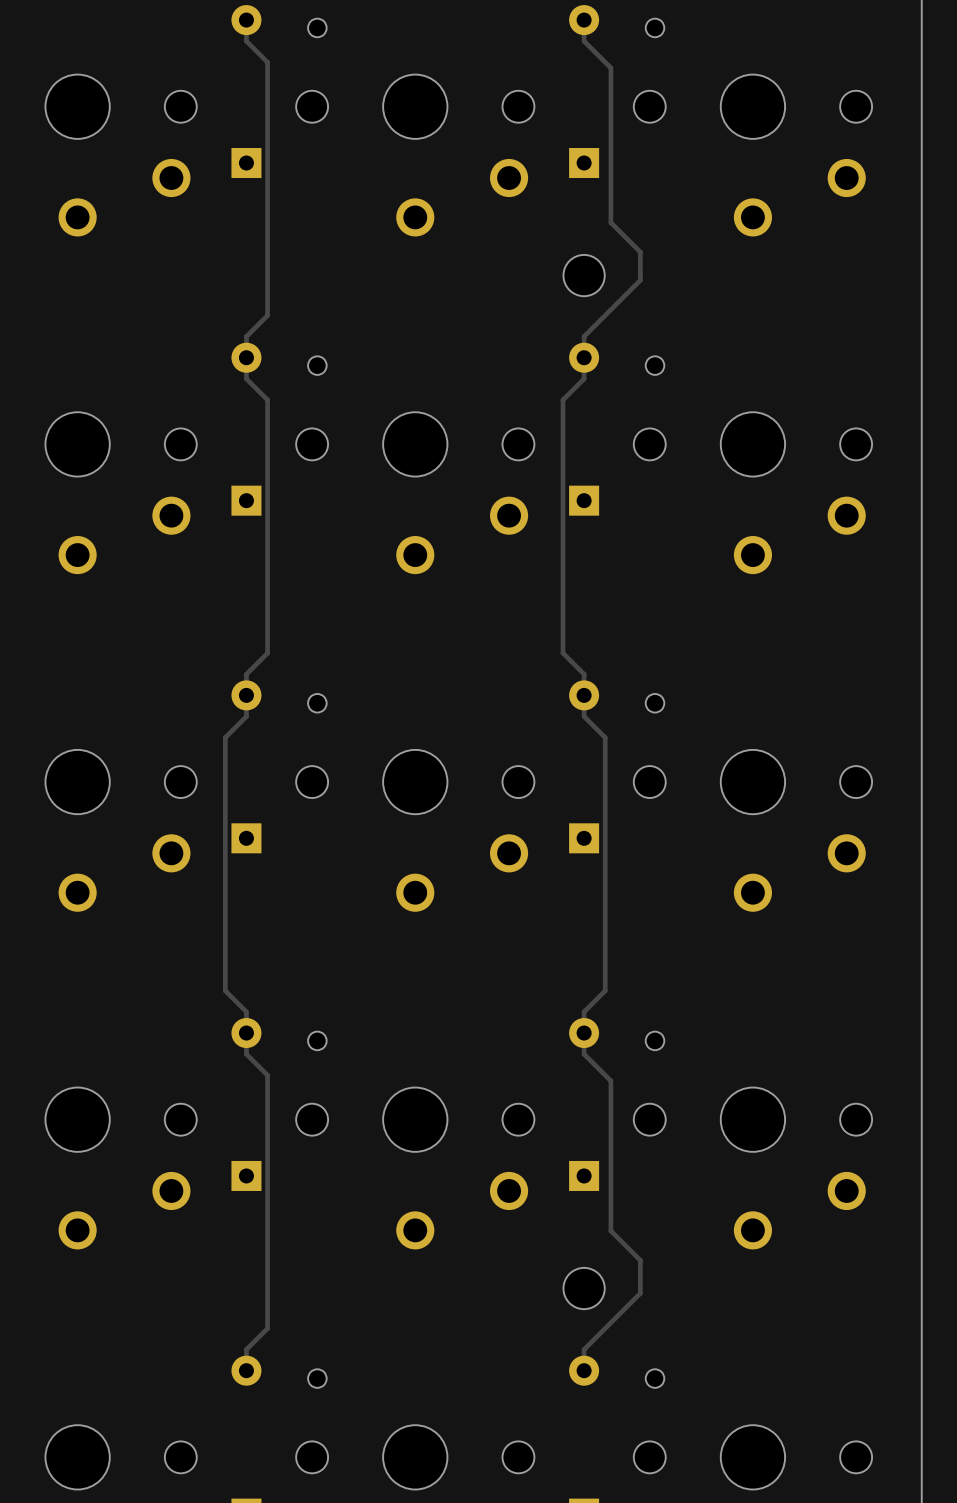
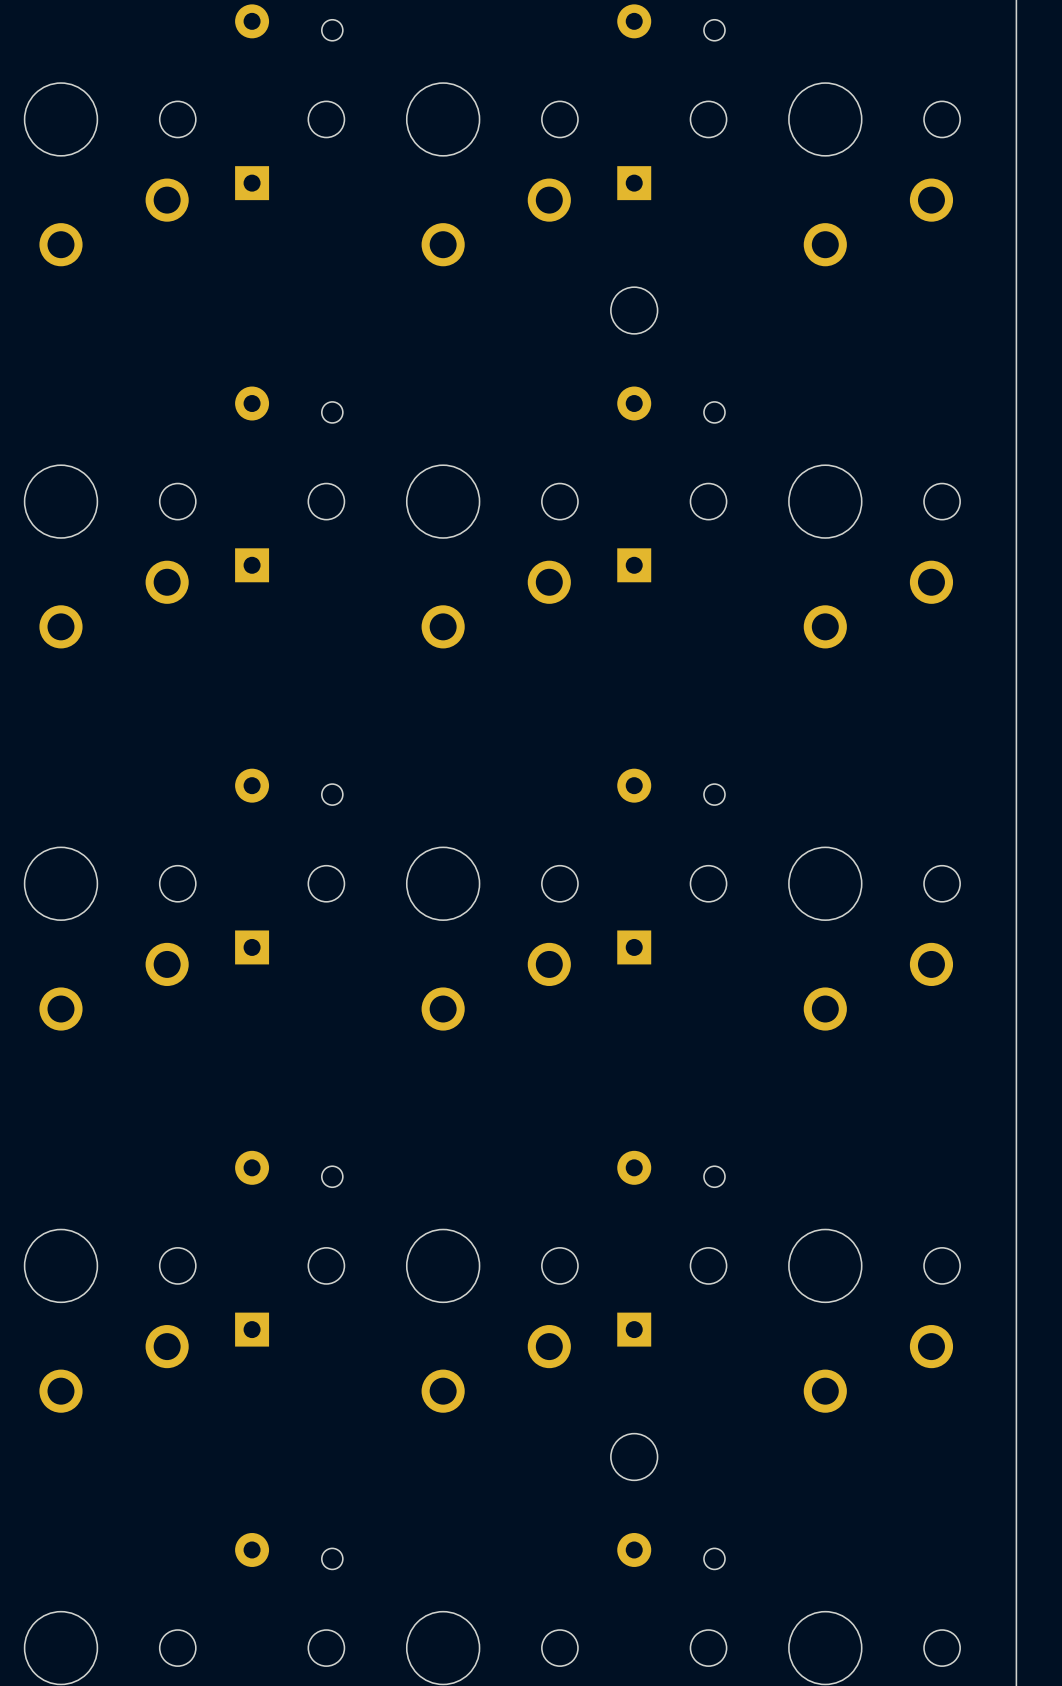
track: (246, 20) (246, 41) (267, 62) (267, 315) (246, 336) (246, 378) (267, 399) (267, 653) (246, 674) (246, 716) (225, 737) (225, 990) (246, 1011) (246, 1054) (267, 1075) (267, 1328) (246, 1349) (246, 1370) -> none
track: (584, 20) (584, 41) (610, 68) (610, 222) (640, 252) (640, 280) (584, 336) (584, 378) (563, 399) (563, 653) (584, 674) (584, 716) (605, 737) (605, 990) (584, 1011) (584, 1054) (610, 1080) (610, 1230) (640, 1260) (640, 1293) (584, 1349) (584, 1370) -> none

